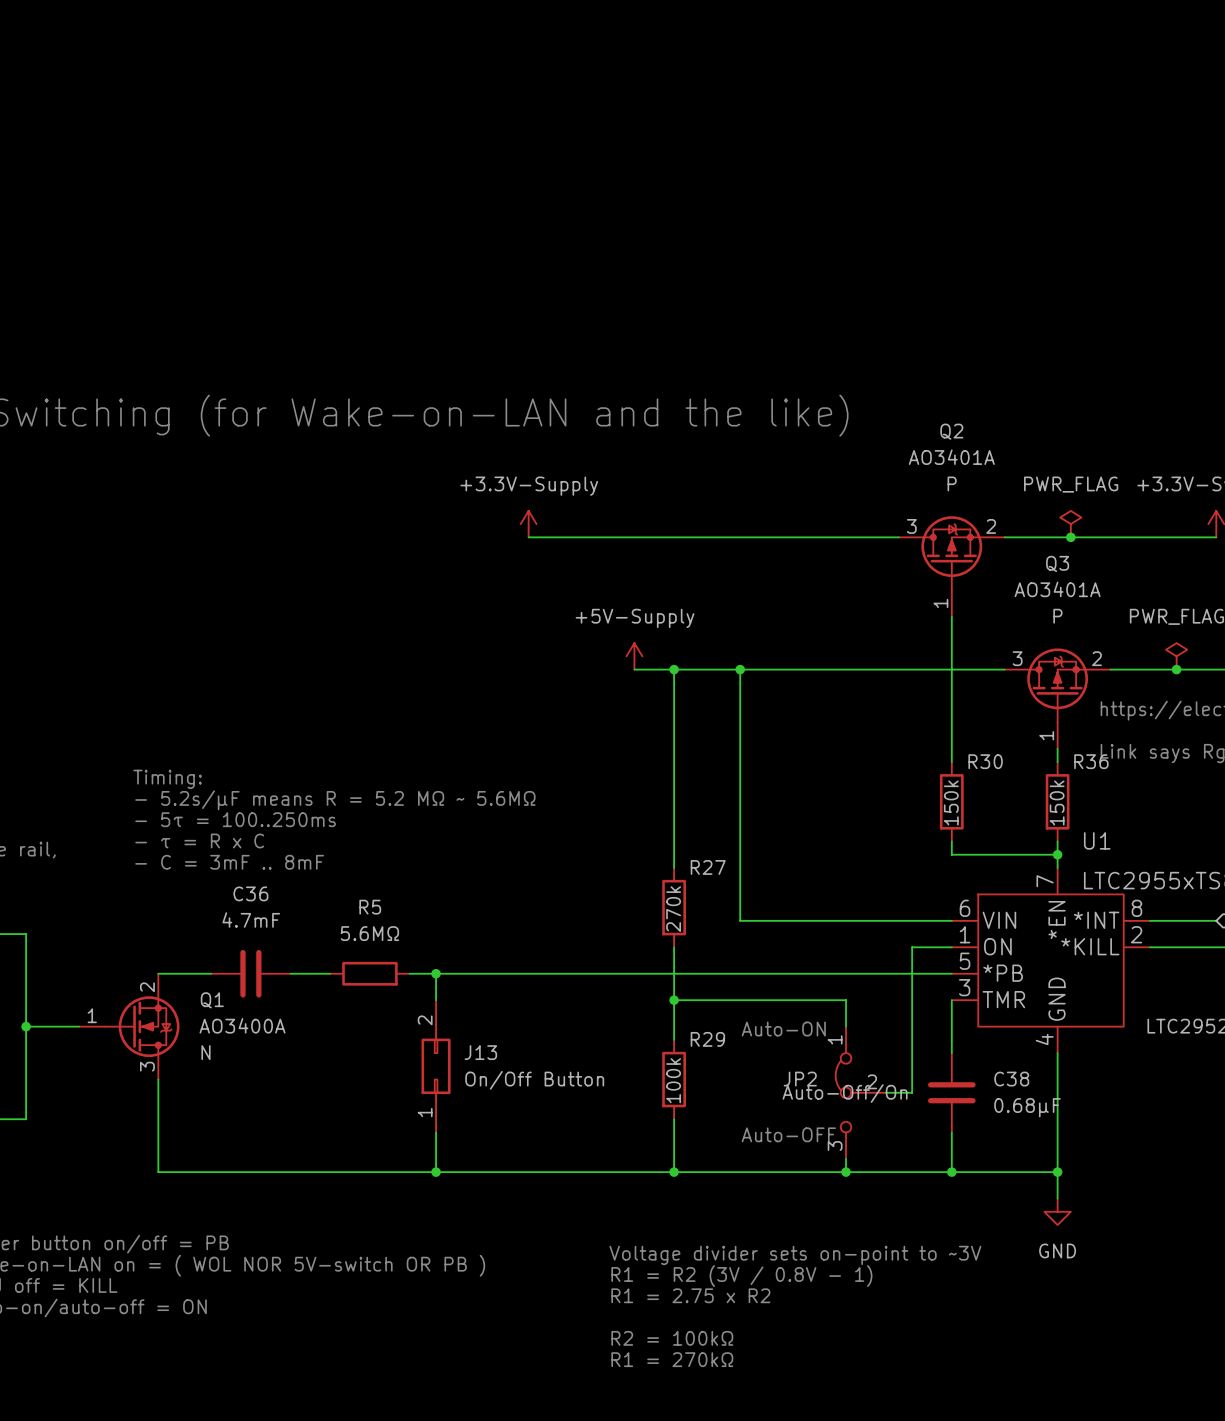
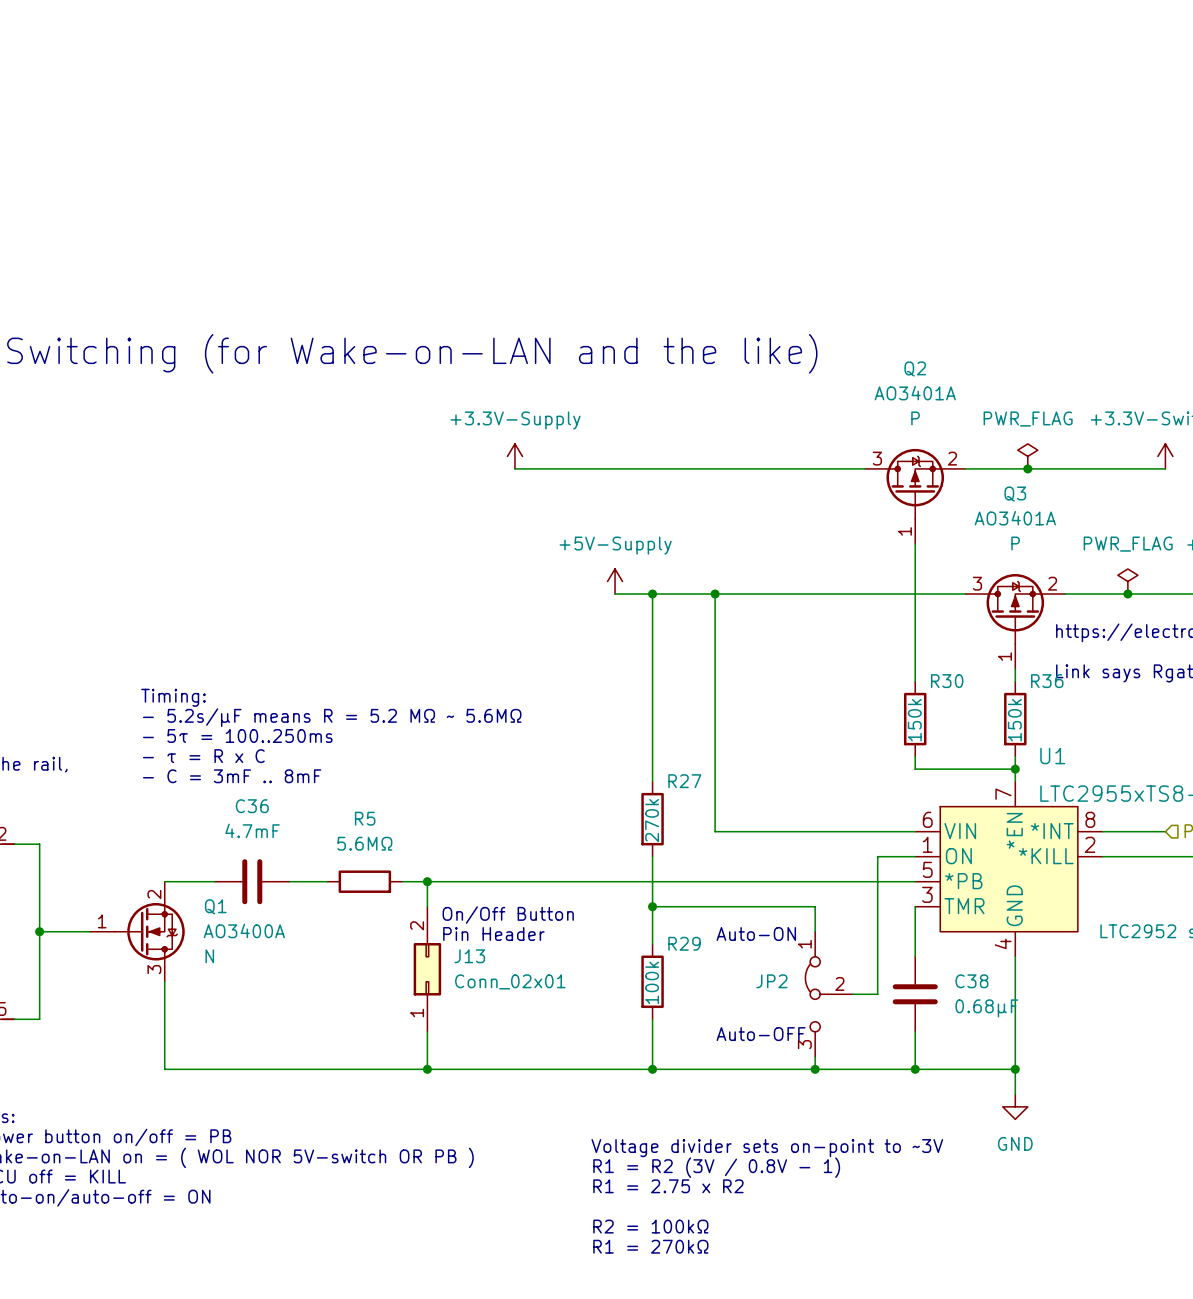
text: none -> On/Off Button (508, 915)
text: none -> Pin Header (493, 934)
J13 value: On/Off Button (534, 1080) -> Conn_02x01 (510, 981)
JP2 text: Auto-Off/On (845, 1093) -> none

